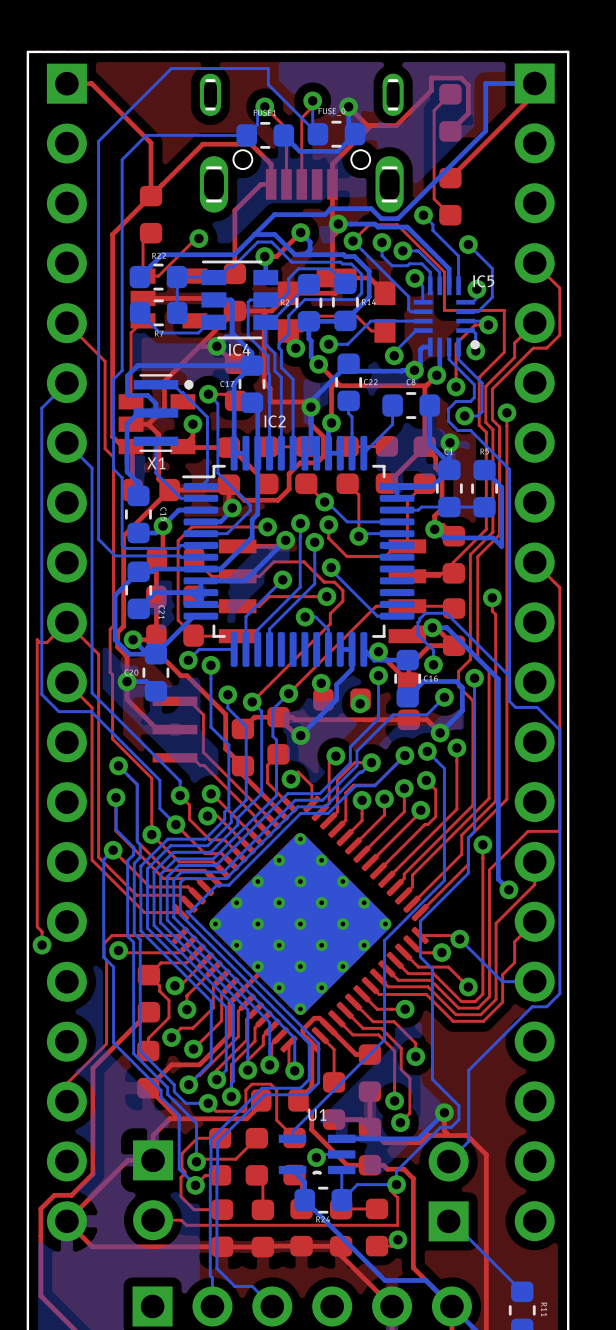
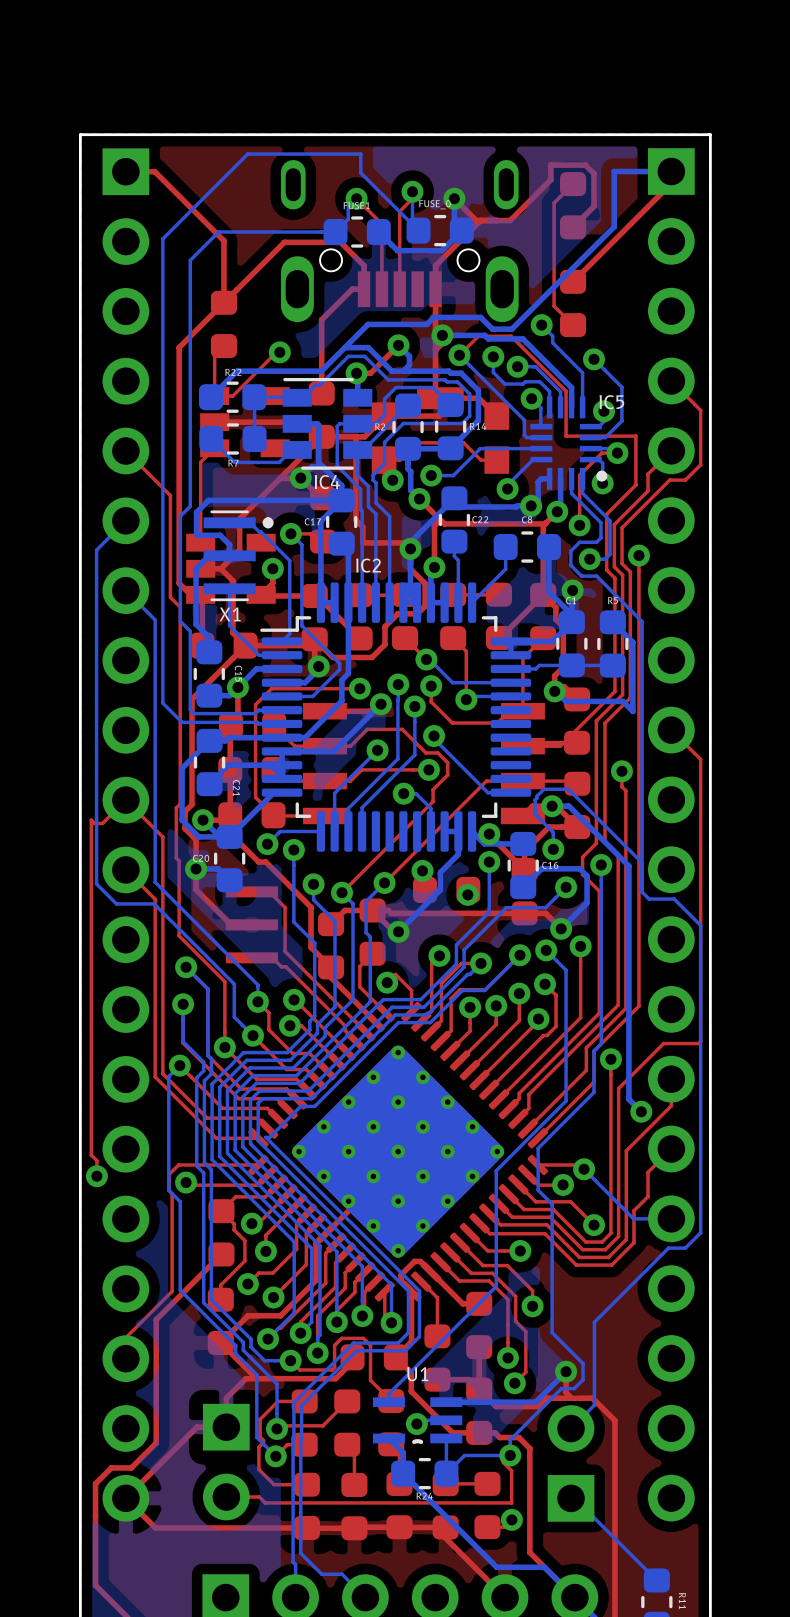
part footprint: [199, 73, 404, 213] -> [280, 159, 519, 323]

